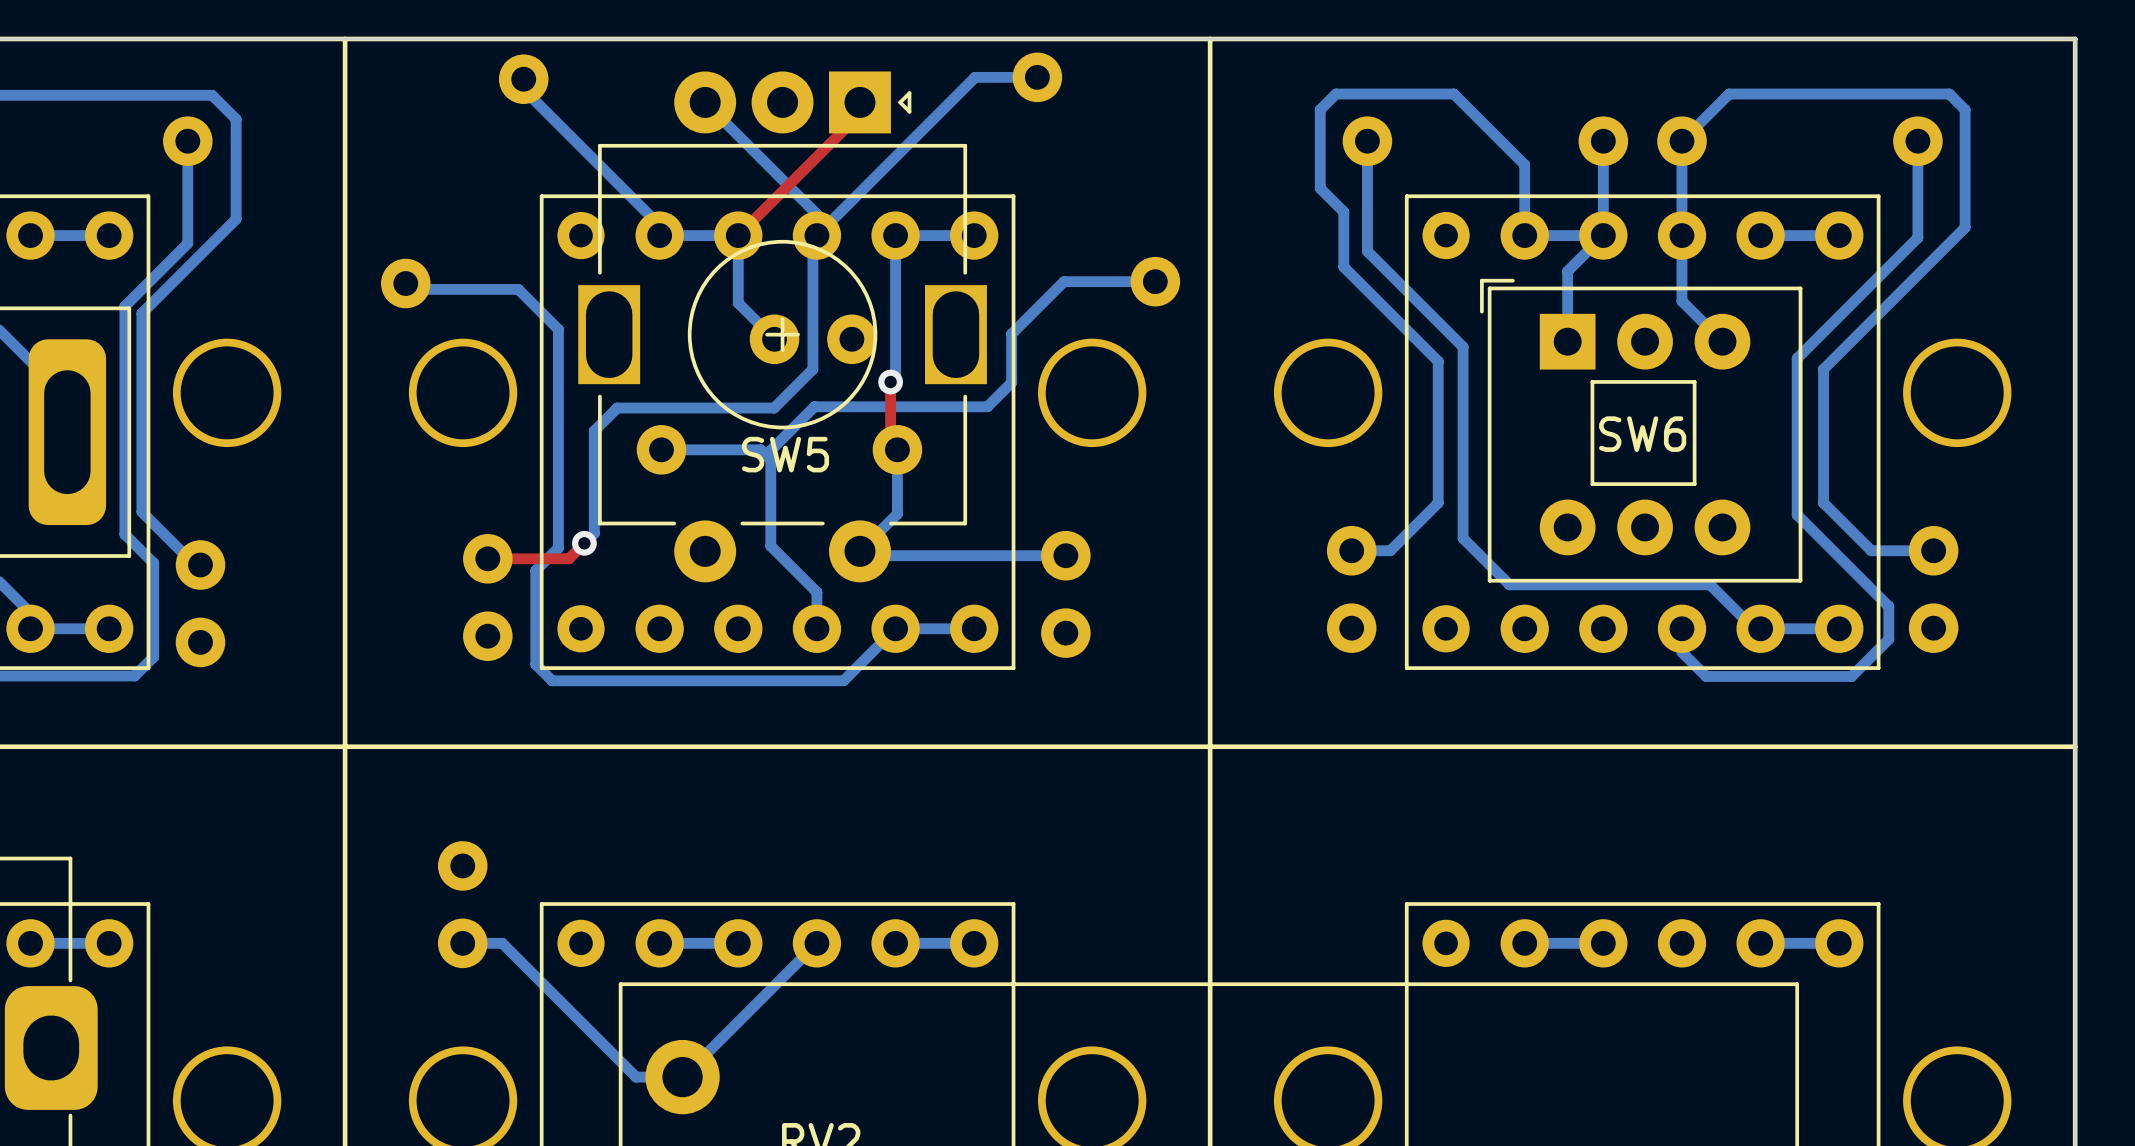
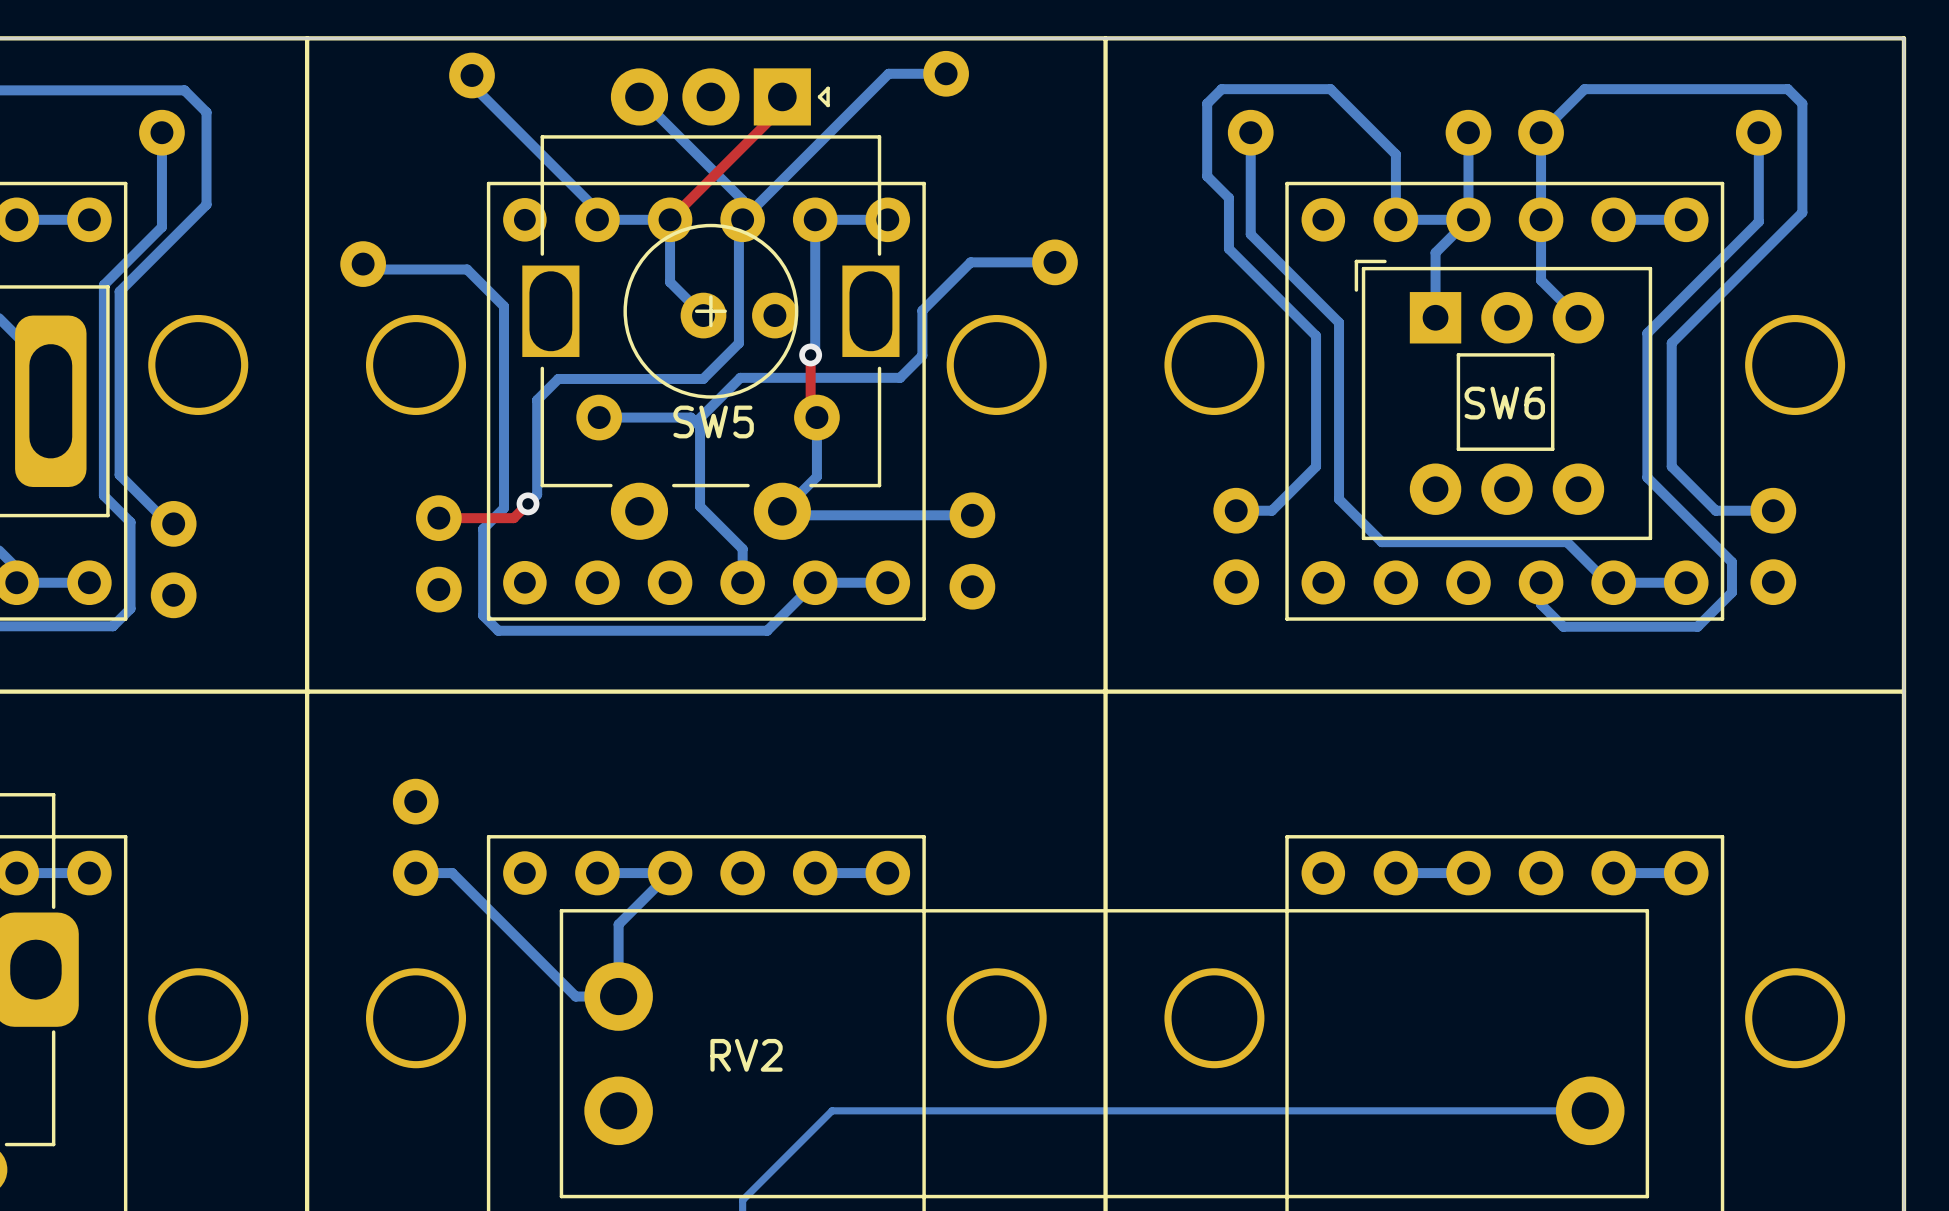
bottom track: (816, 943) (682, 1077) -> (670, 873) (618, 924) (618, 996)

